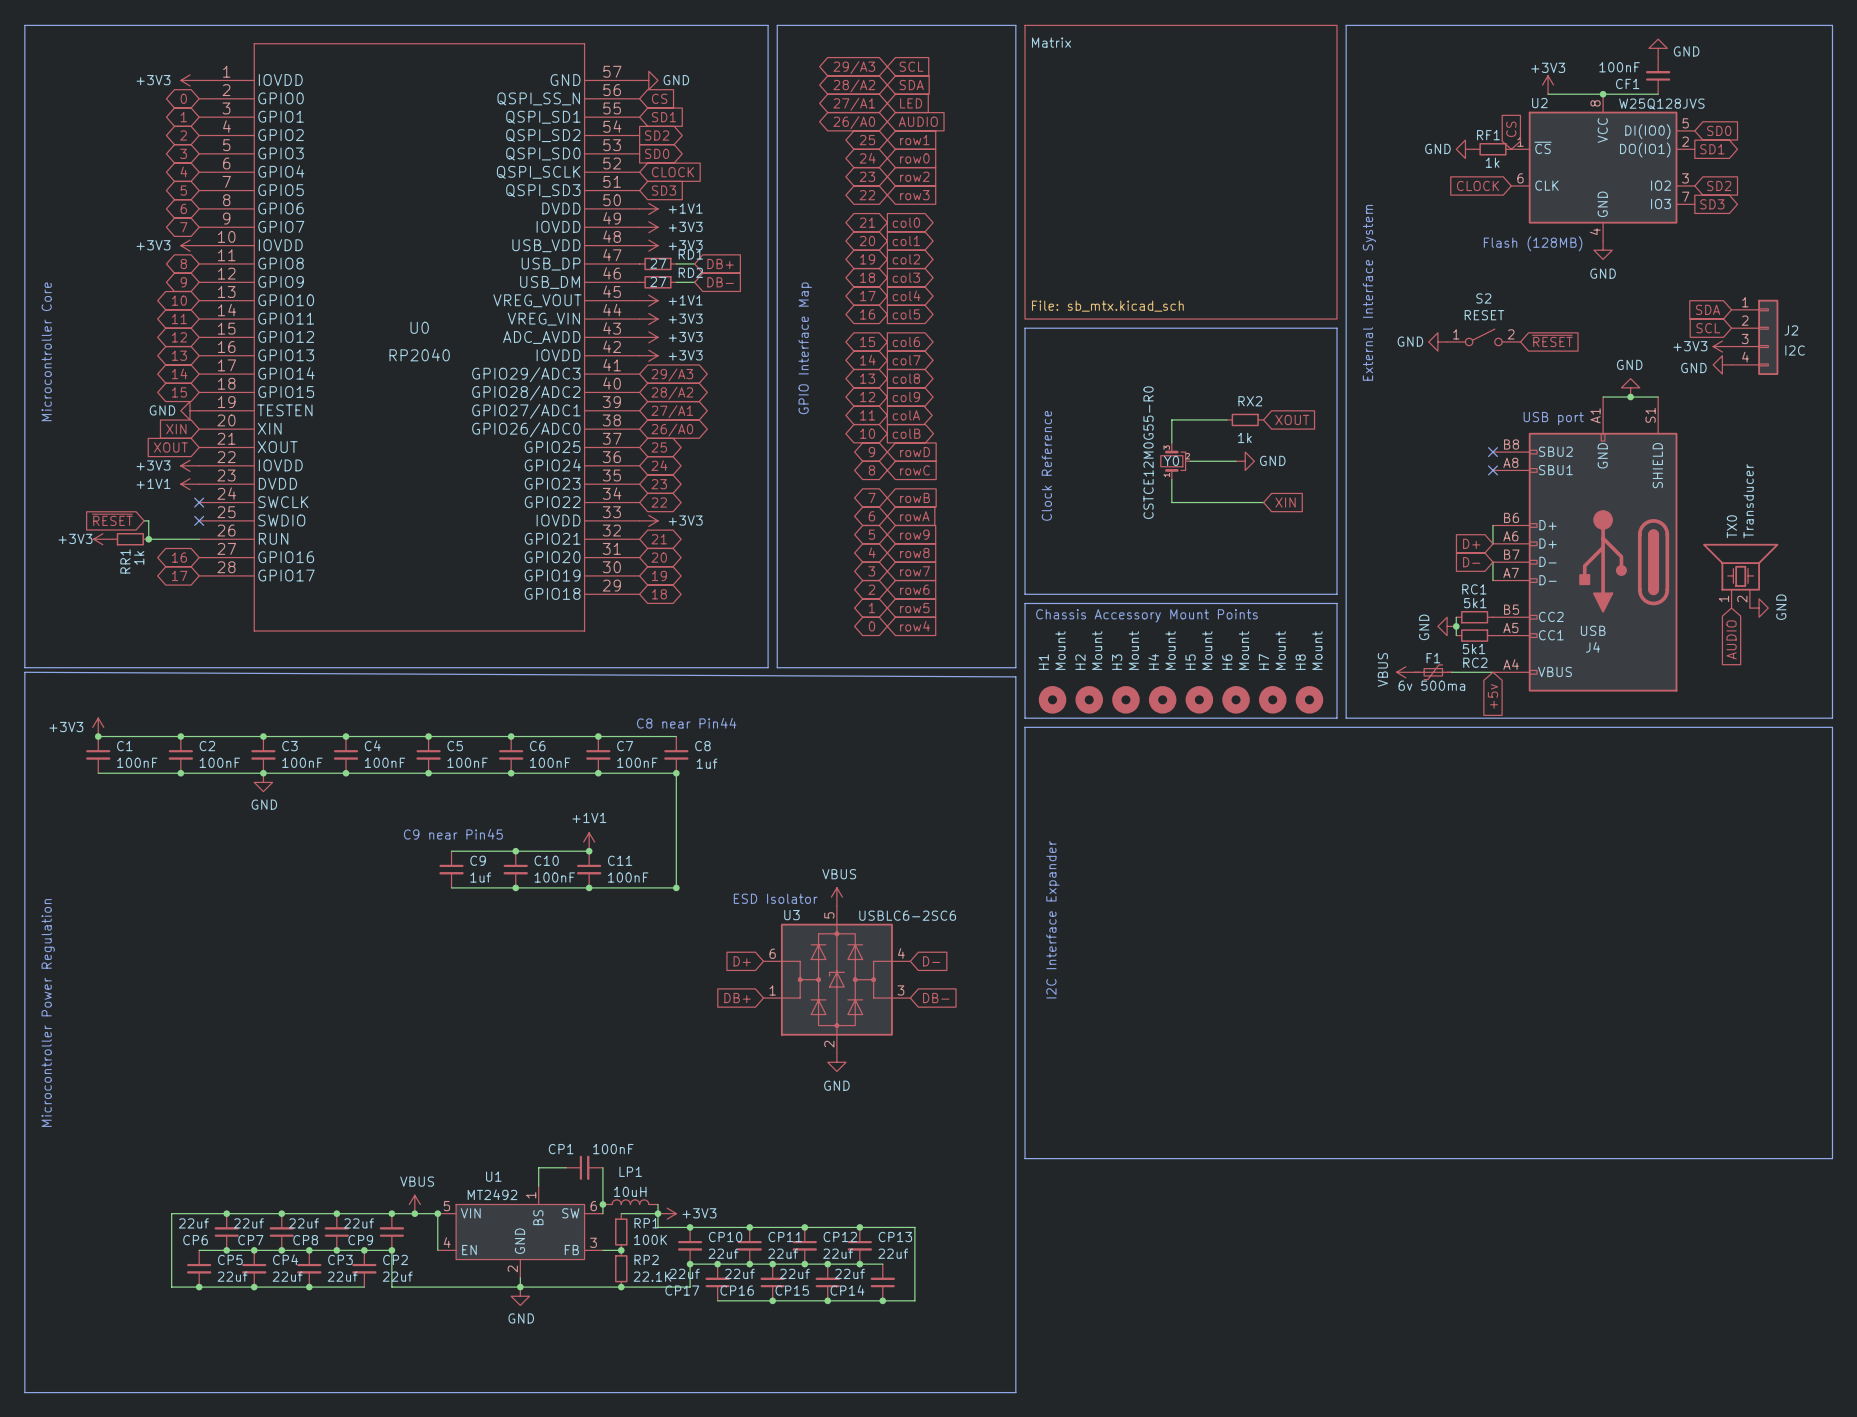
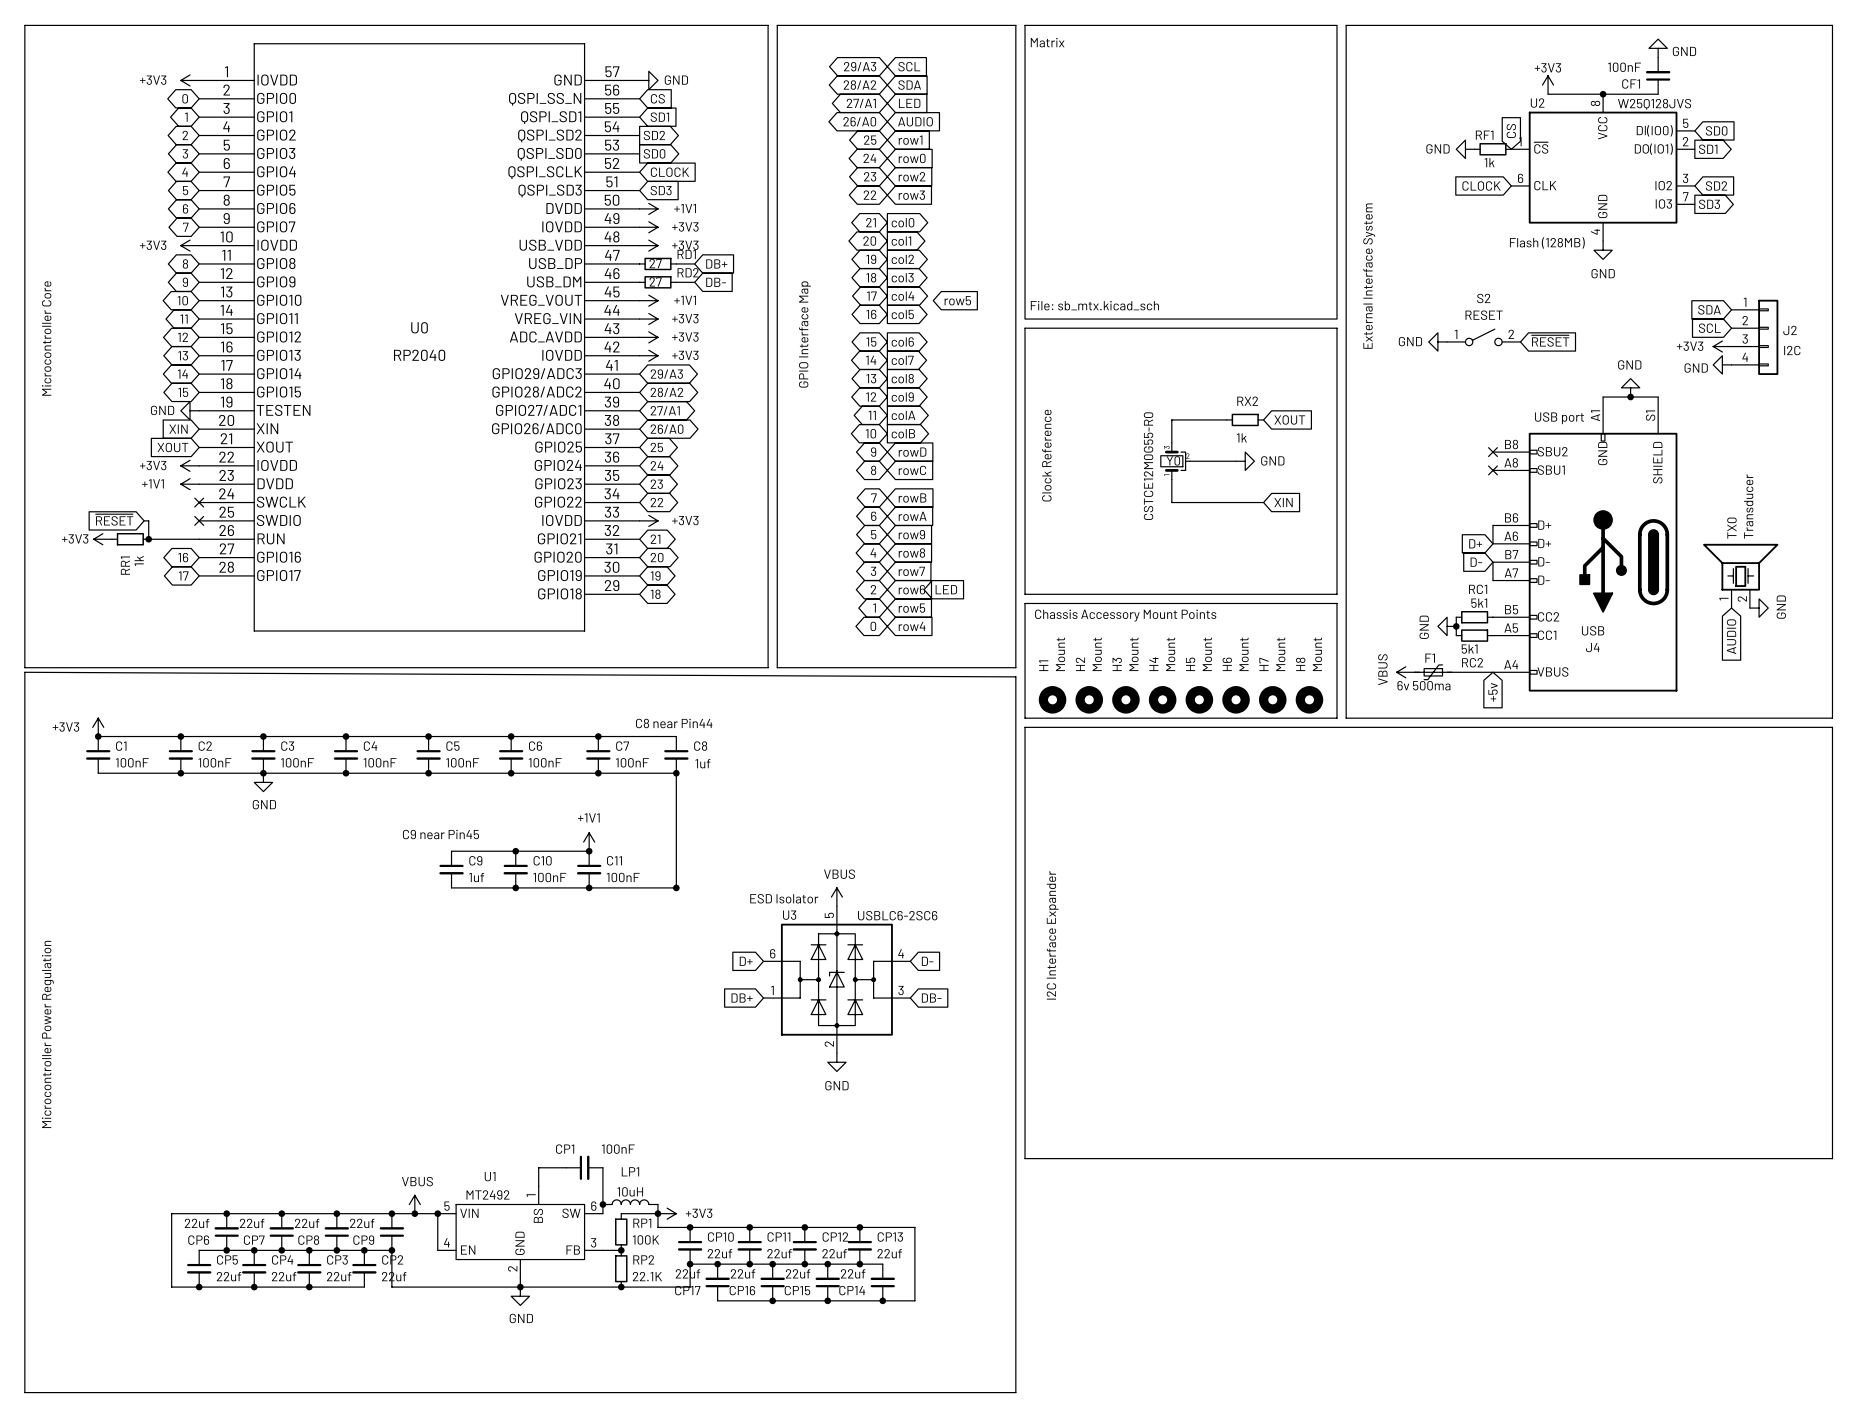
global label: none -> row5 (957, 300)
global label: none -> LED (946, 589)

